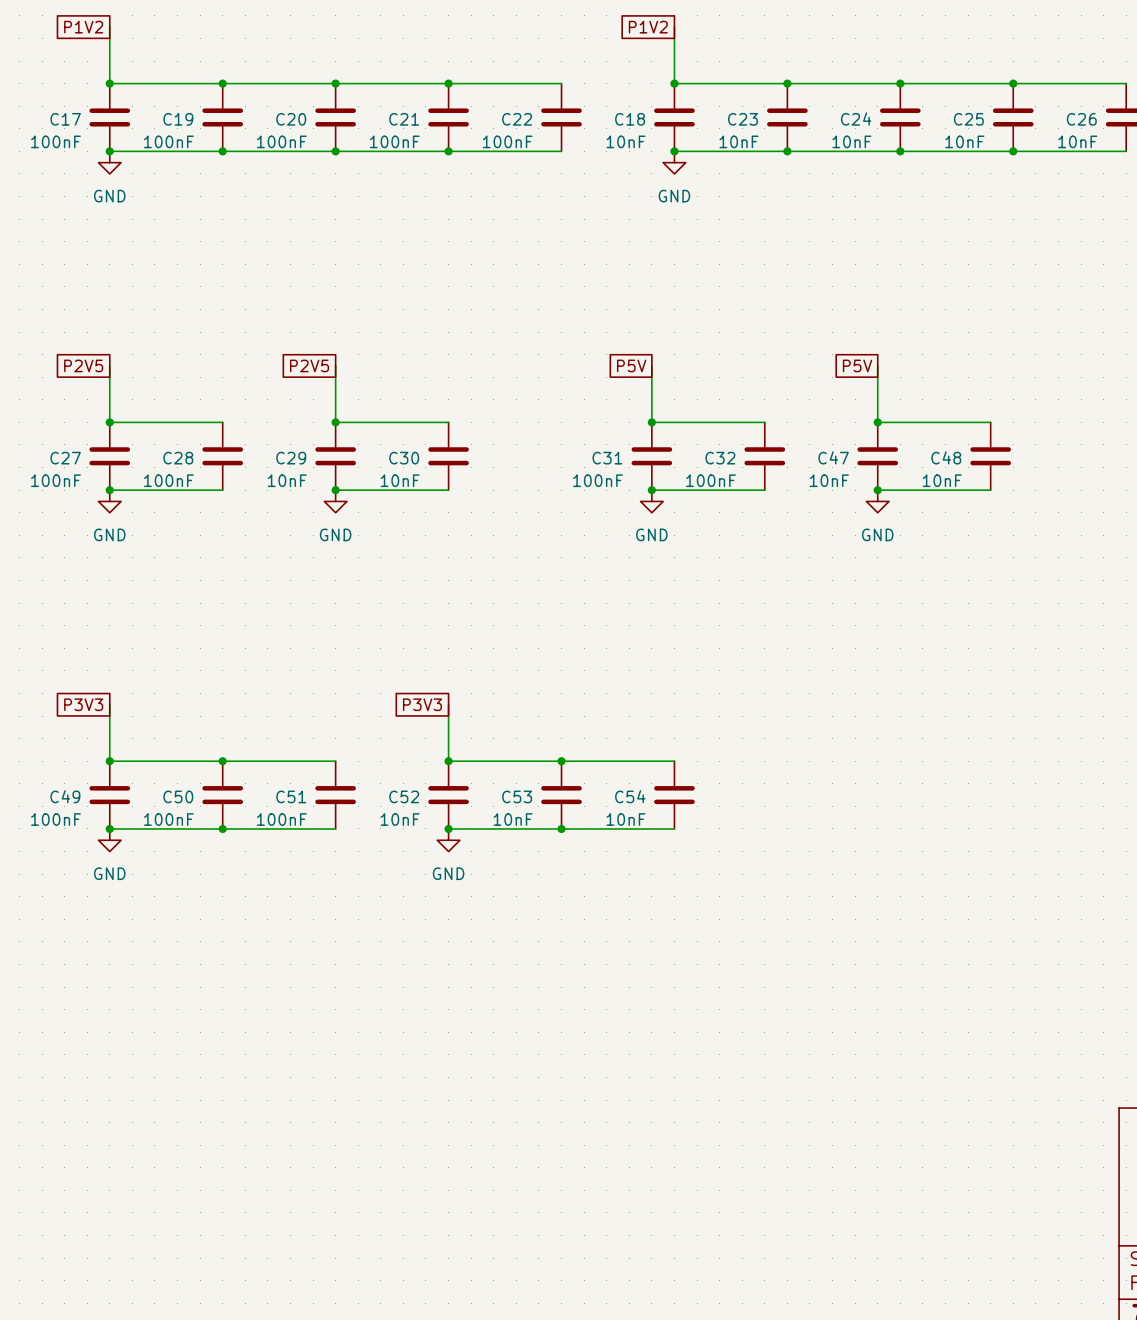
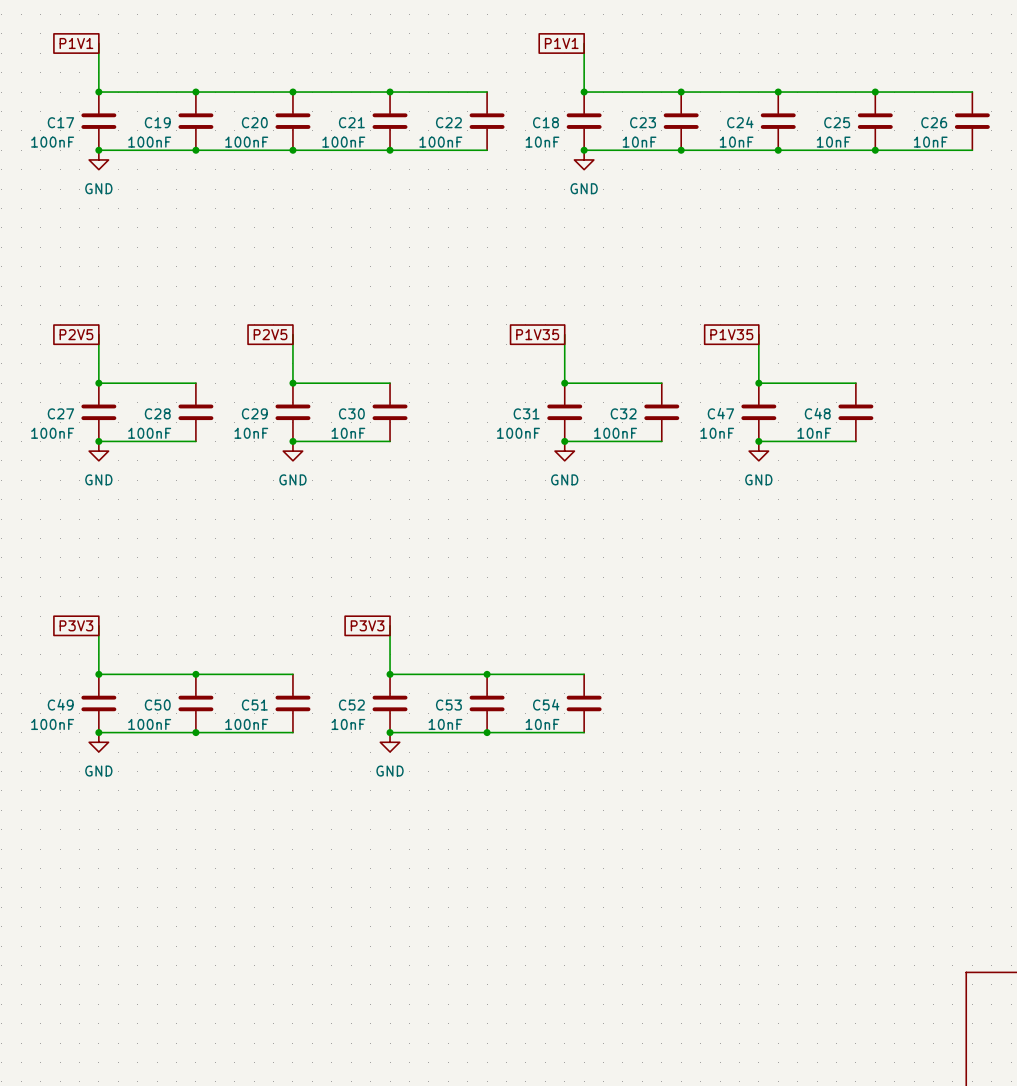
global label: P1V2 (83, 27) -> P1V1 (76, 43)
global label: P1V2 (648, 27) -> P1V1 (561, 43)
global label: P5V (631, 365) -> P1V35 (537, 334)
global label: P5V (857, 365) -> P1V35 (731, 334)

